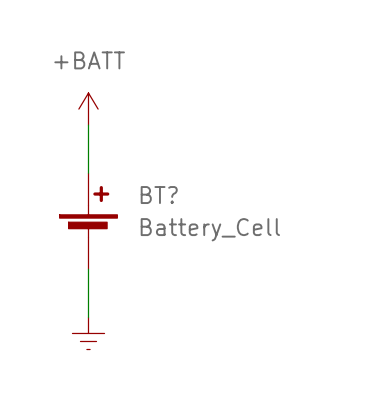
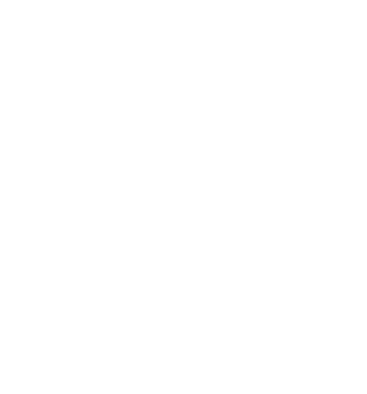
power symbol: +BATT (88, 109) -> none
wire: (88, 125) (88, 173) -> none
BT?: Battery_Cell (88, 221) -> none
wire: (88, 269) (88, 317) -> none
power symbol: (88, 333) -> none

